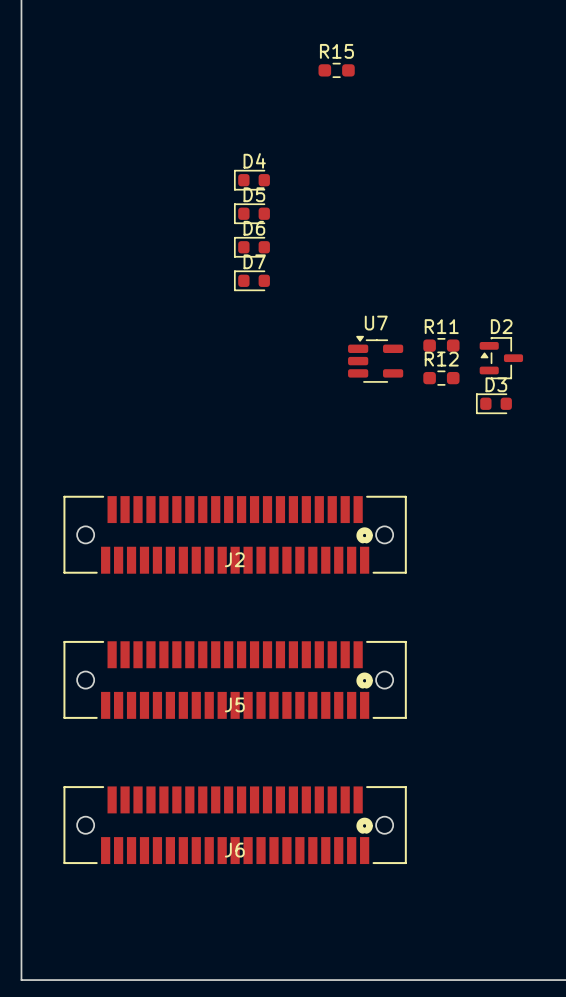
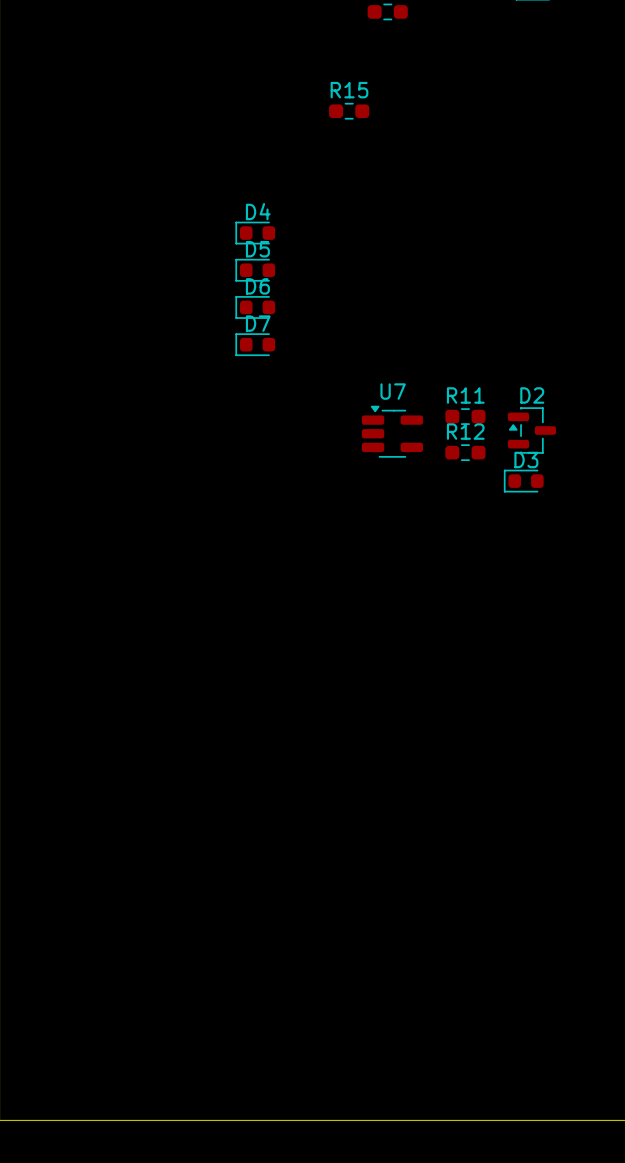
J2: (235, 534) -> none
J5: (235, 679) -> none
J6: (235, 825) -> none

